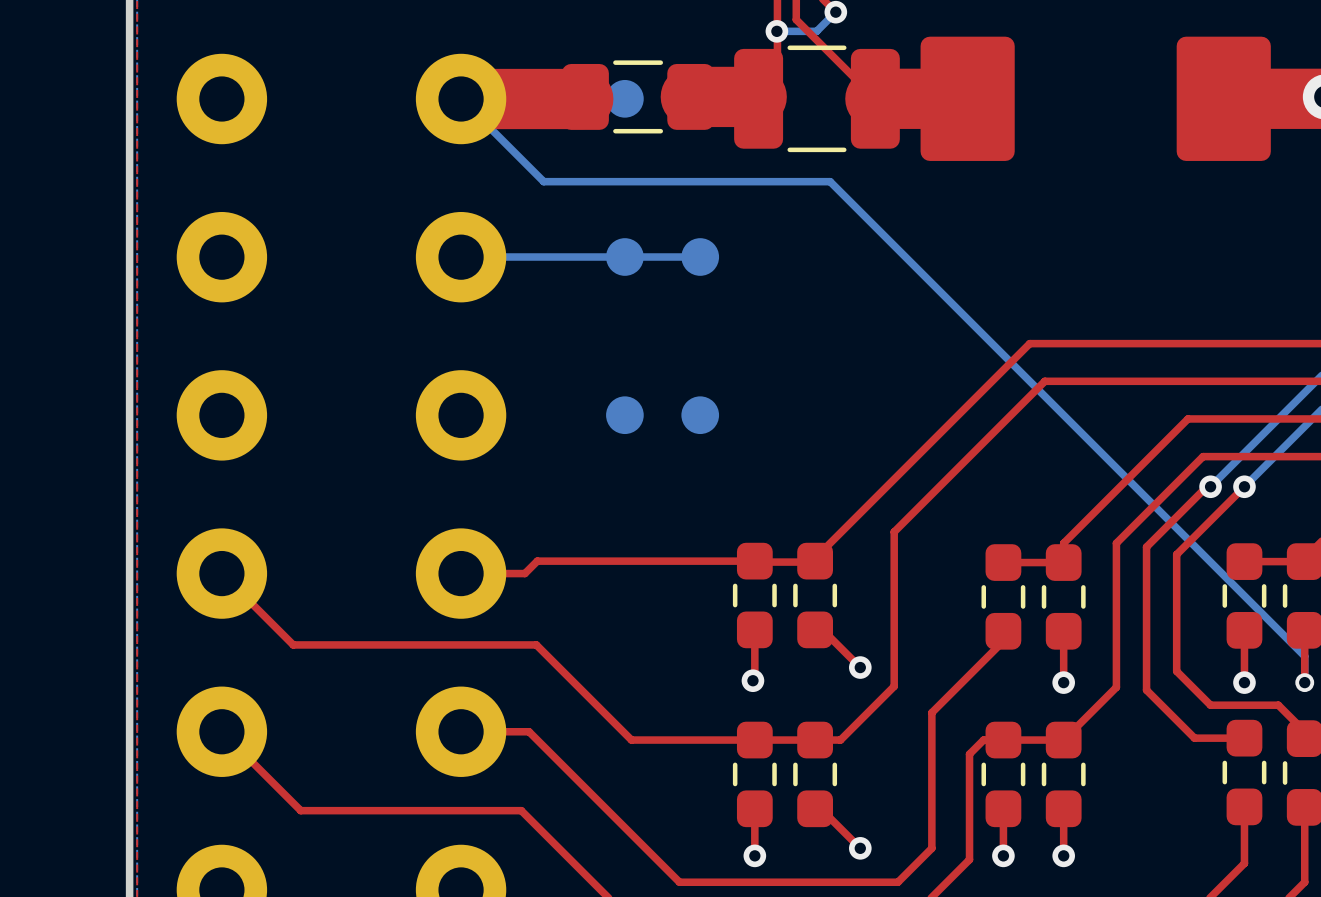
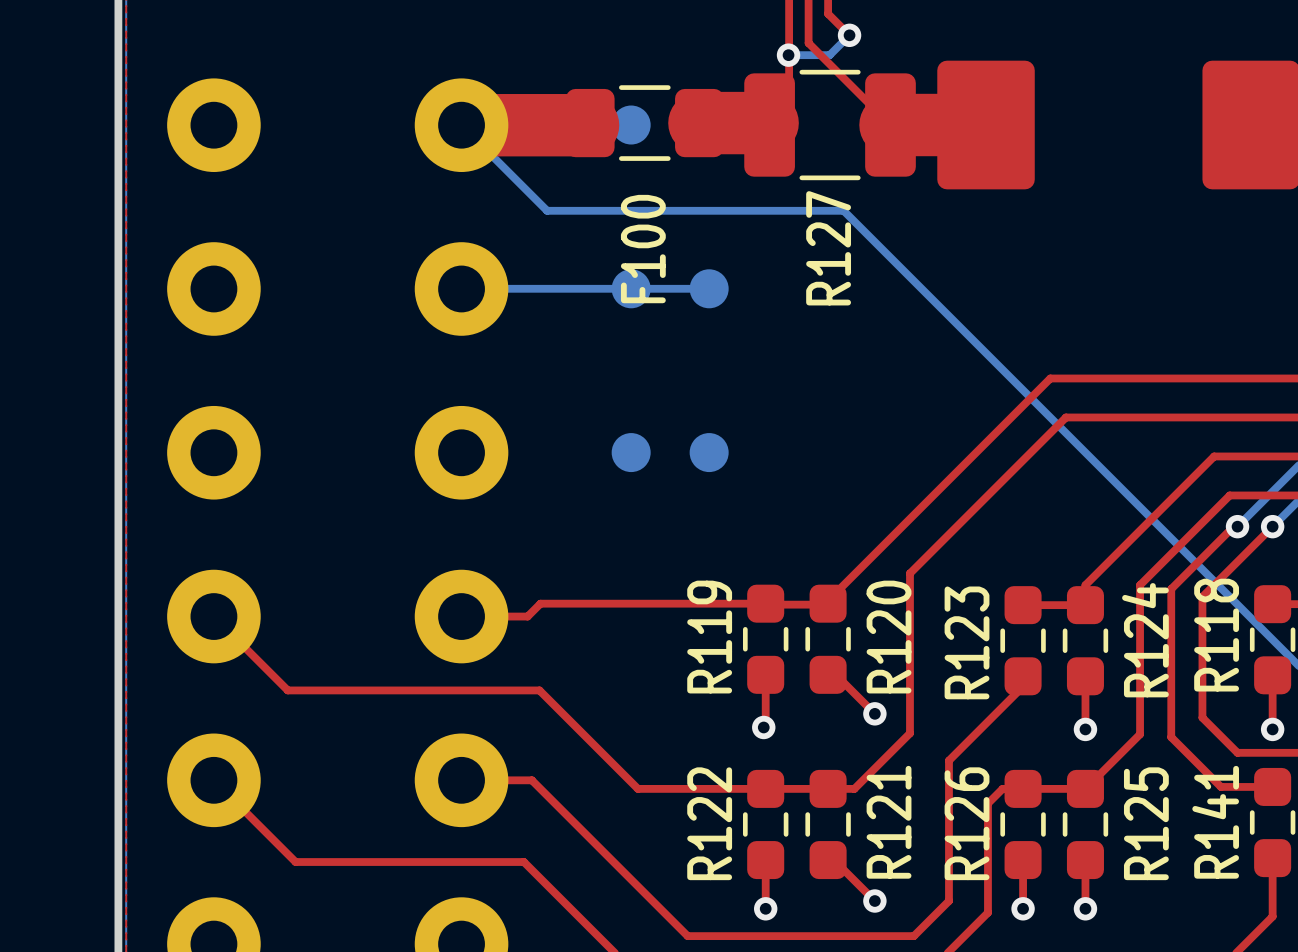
R127 name: none -> R127 (828, 248)
F100 name: none -> F100 (643, 249)
R118 name: none -> R118 (1216, 635)
R119 name: none -> R119 (709, 637)
R120 name: none -> R120 (889, 637)
R124 name: none -> R124 (1145, 640)
R123 name: none -> R123 (967, 642)
R121 name: none -> R121 (889, 822)
R141 name: none -> R141 (1215, 822)
R122 name: none -> R122 (709, 823)
R126 name: none -> R126 (967, 823)
R125 name: none -> R125 (1146, 823)

